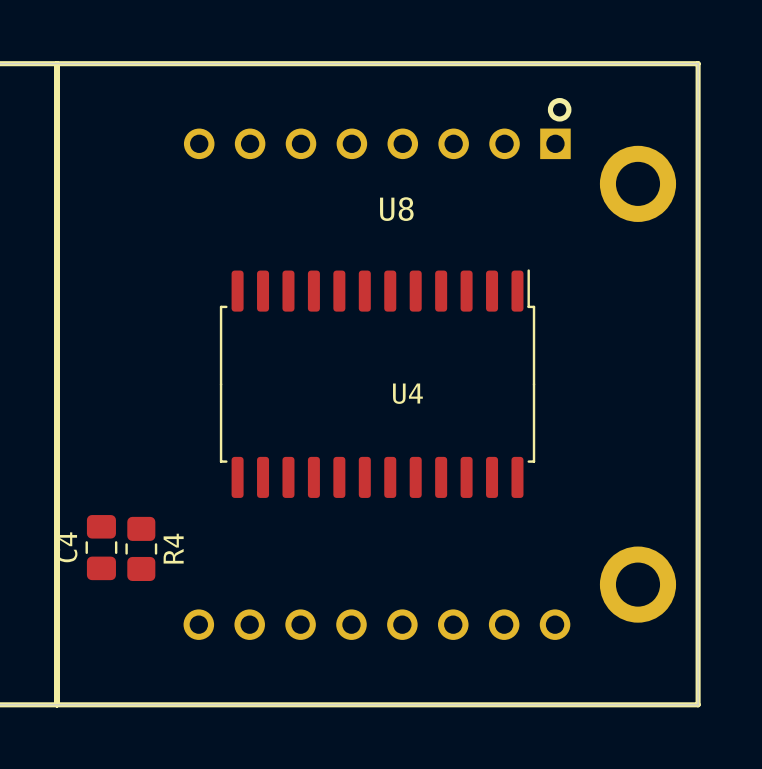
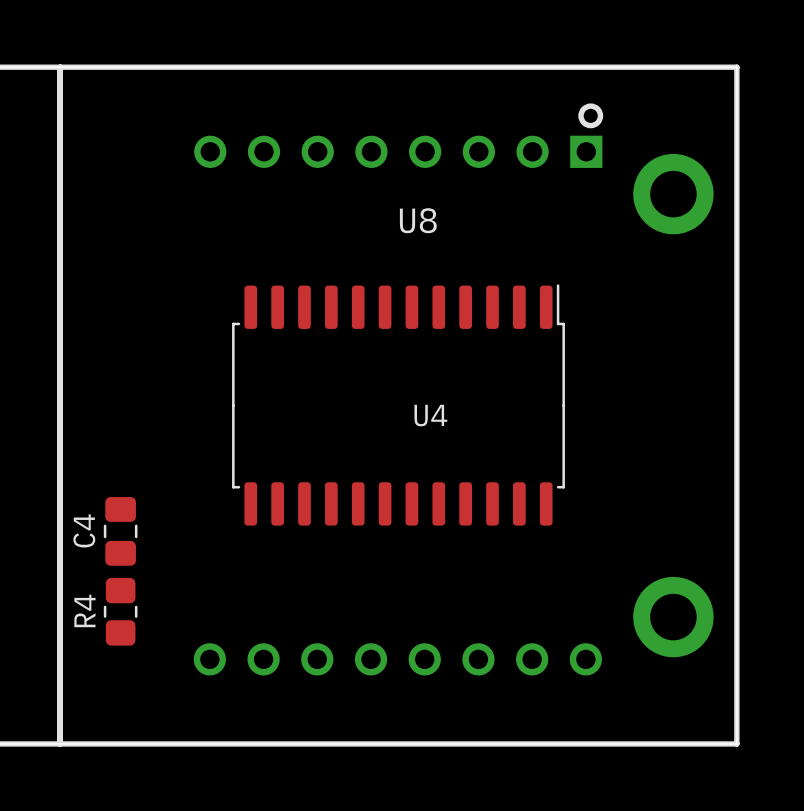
C4 position: (101, 547) -> (120, 531)
R4 position: (141, 548) -> (120, 611)
R4 name position: R4 (173, 548) -> R4 (84, 610)

